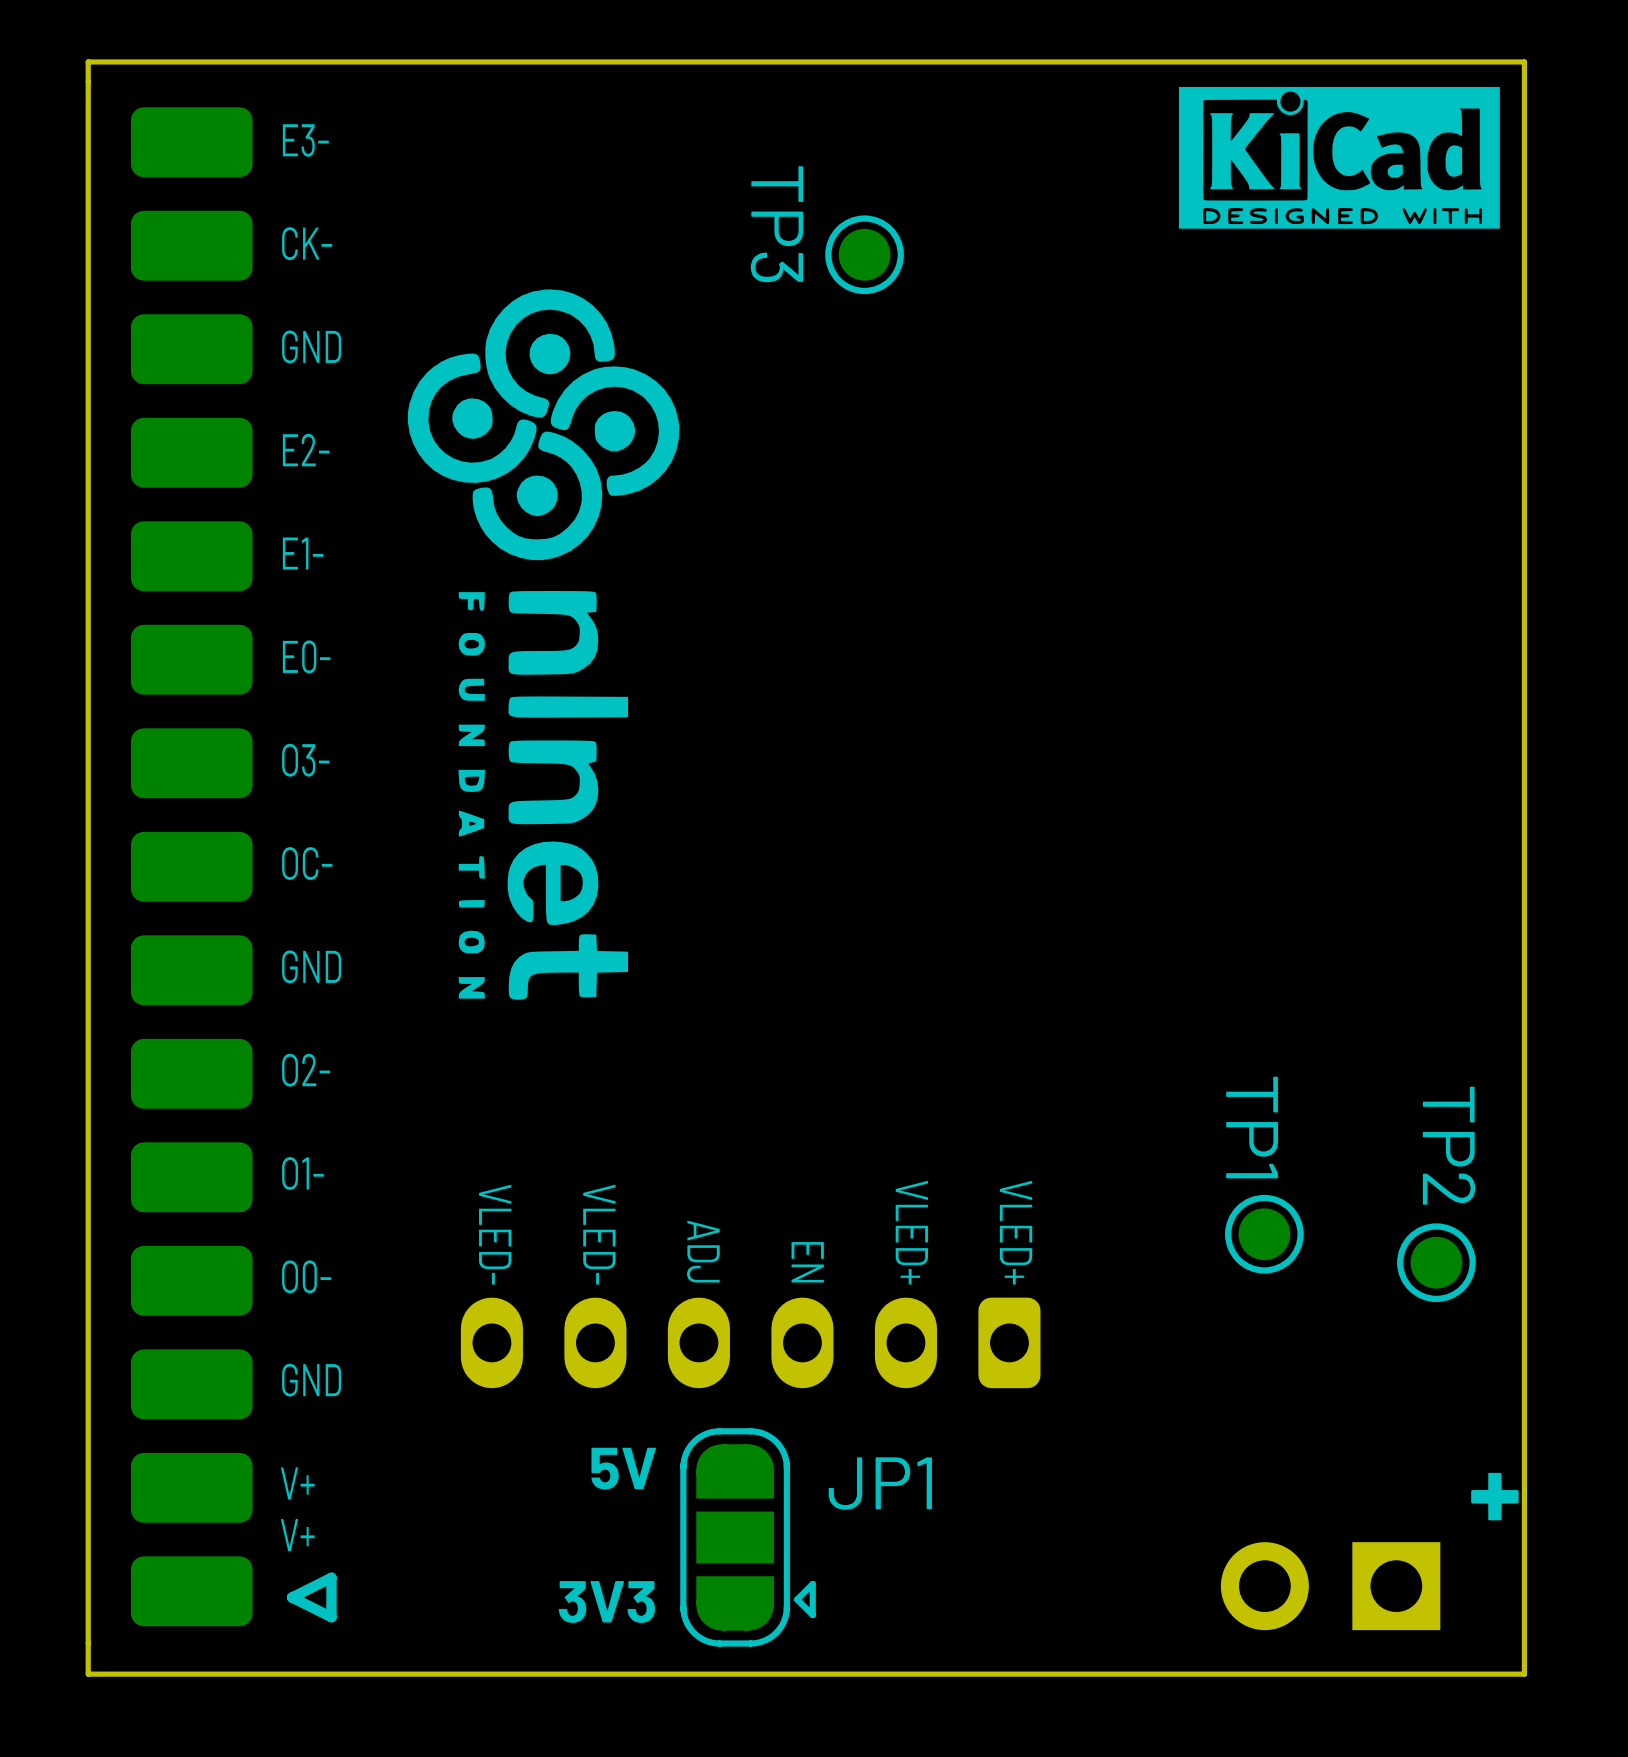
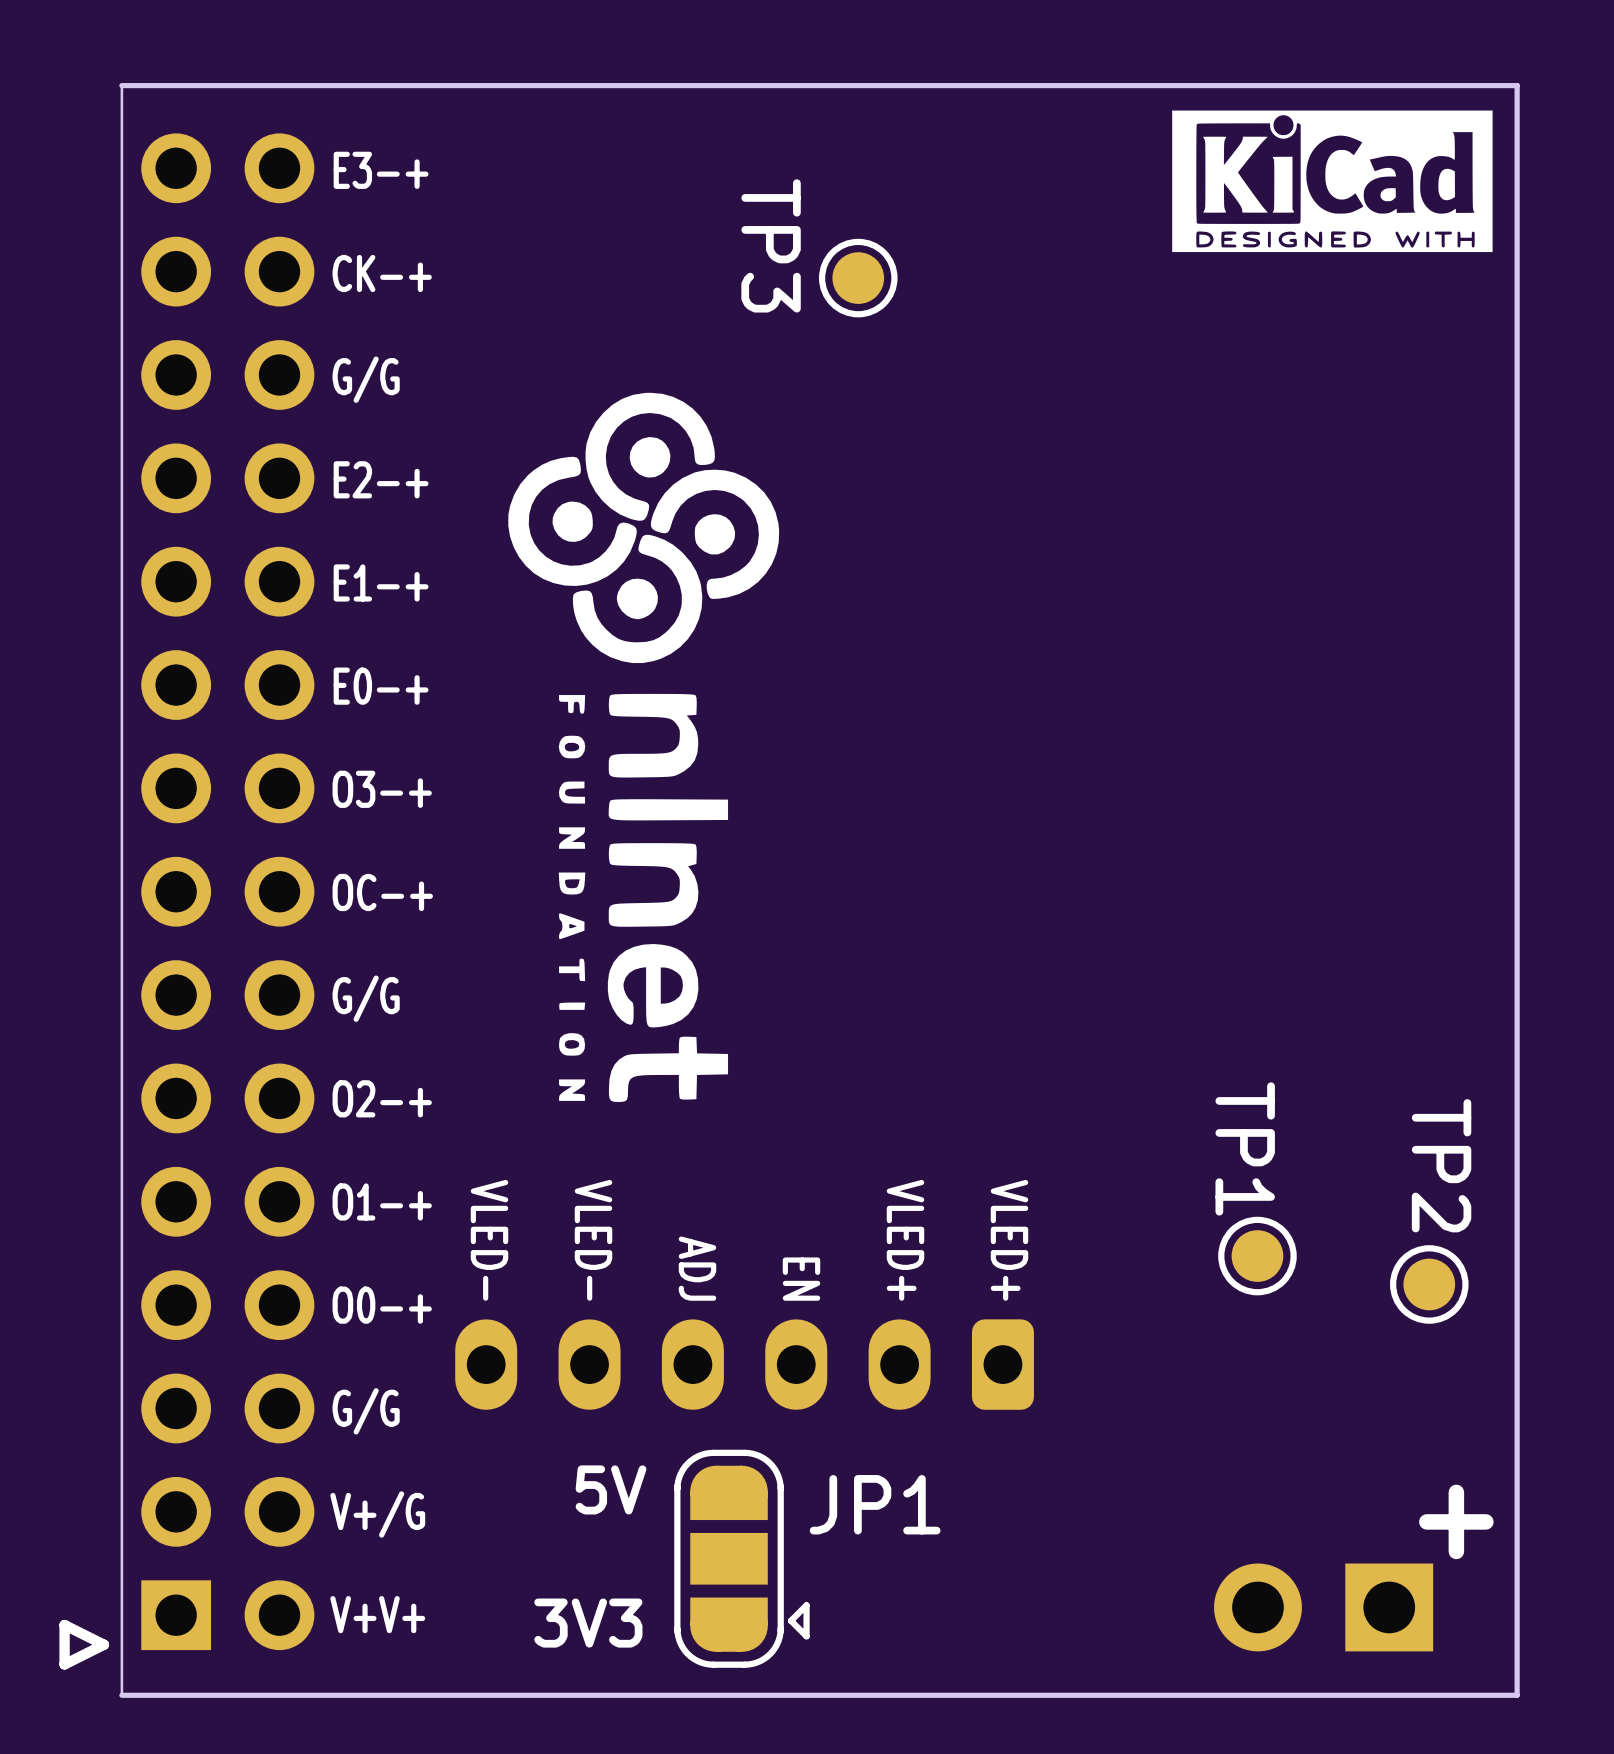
board edge: (127, 61) (88, 61) (88, 81) -> none
part footprint: [85, 79, 337, 1646] -> [59, 133, 315, 1670]
text: E3- (305, 140) -> E3-+ (381, 170)
text: CK- (307, 243) -> CK-+ (382, 273)
text: GND (311, 346) -> none
text: none -> G/G (366, 379)
text: E2- (306, 450) -> E2-+ (381, 479)
text: E1- (303, 553) -> E1-+ (381, 582)
drawing position: (543, 644) -> (643, 747)
text: E0- (306, 656) -> E0-+ (381, 686)
text: O3- (305, 760) -> O3-+ (382, 789)
text: OC- (307, 863) -> OC-+ (382, 892)
text: GND (311, 966) -> none
text: none -> G/G (366, 998)
text: O2- (306, 1070) -> O2-+ (382, 1098)
text: O1- (302, 1173) -> O1-+ (382, 1201)
text: O0- (306, 1276) -> O0-+ (382, 1305)
text: GND (311, 1380) -> none
text: none -> G/G (366, 1411)
text: V+ (297, 1483) -> none
text: none -> V+/G (377, 1514)
text: V+ (297, 1535) -> none
text: none -> V+V+ (377, 1614)
board edge: (88, 1643) (88, 1674) (127, 1674) -> (121, 85) (121, 1695)

